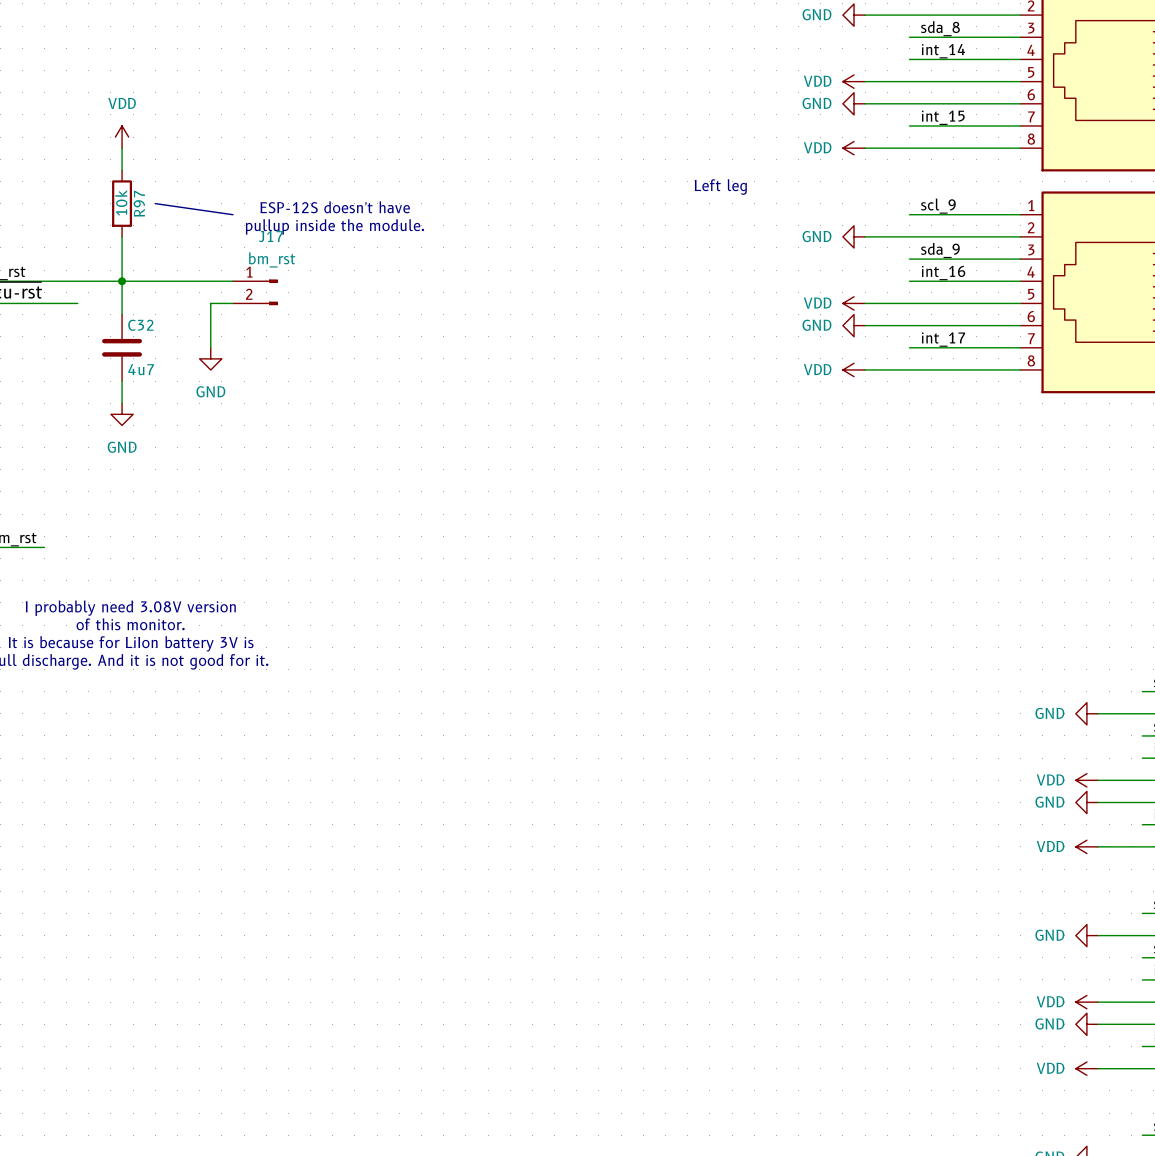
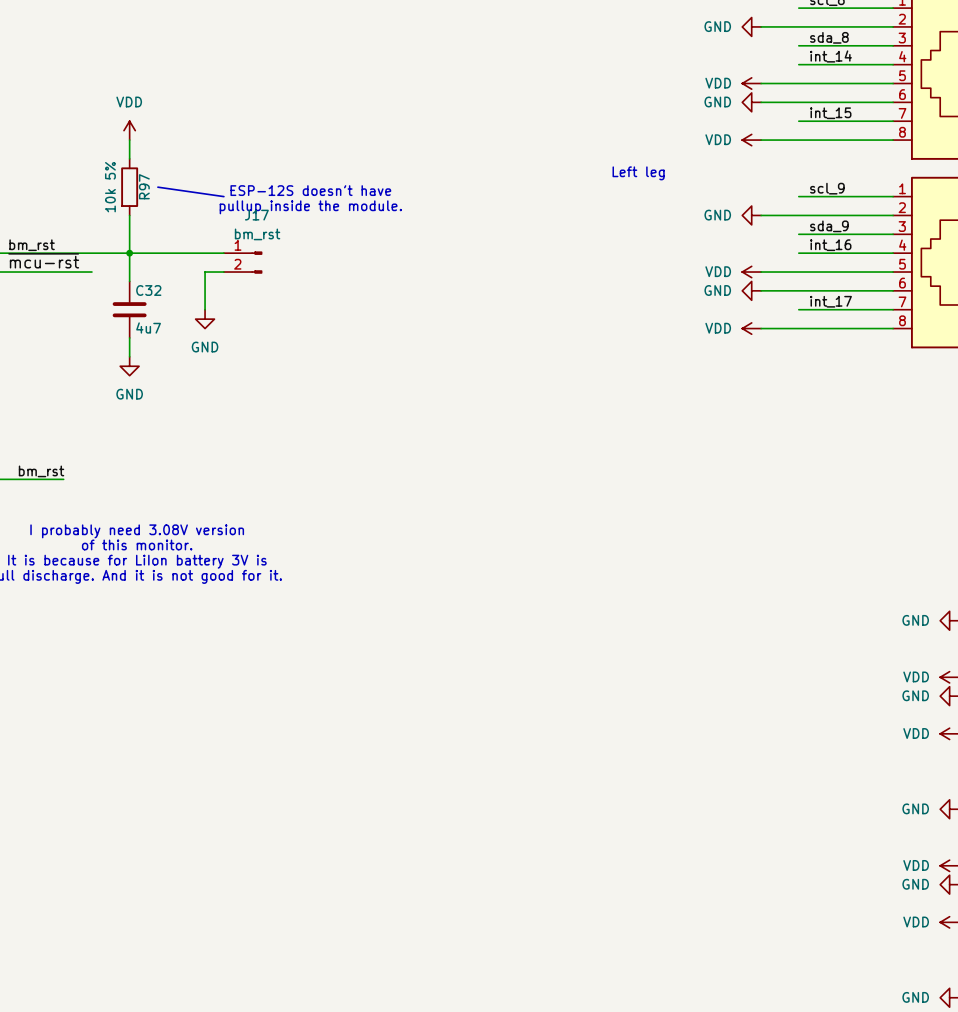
R97 value: 10k (121, 202) -> 10k 5% (110, 187)

